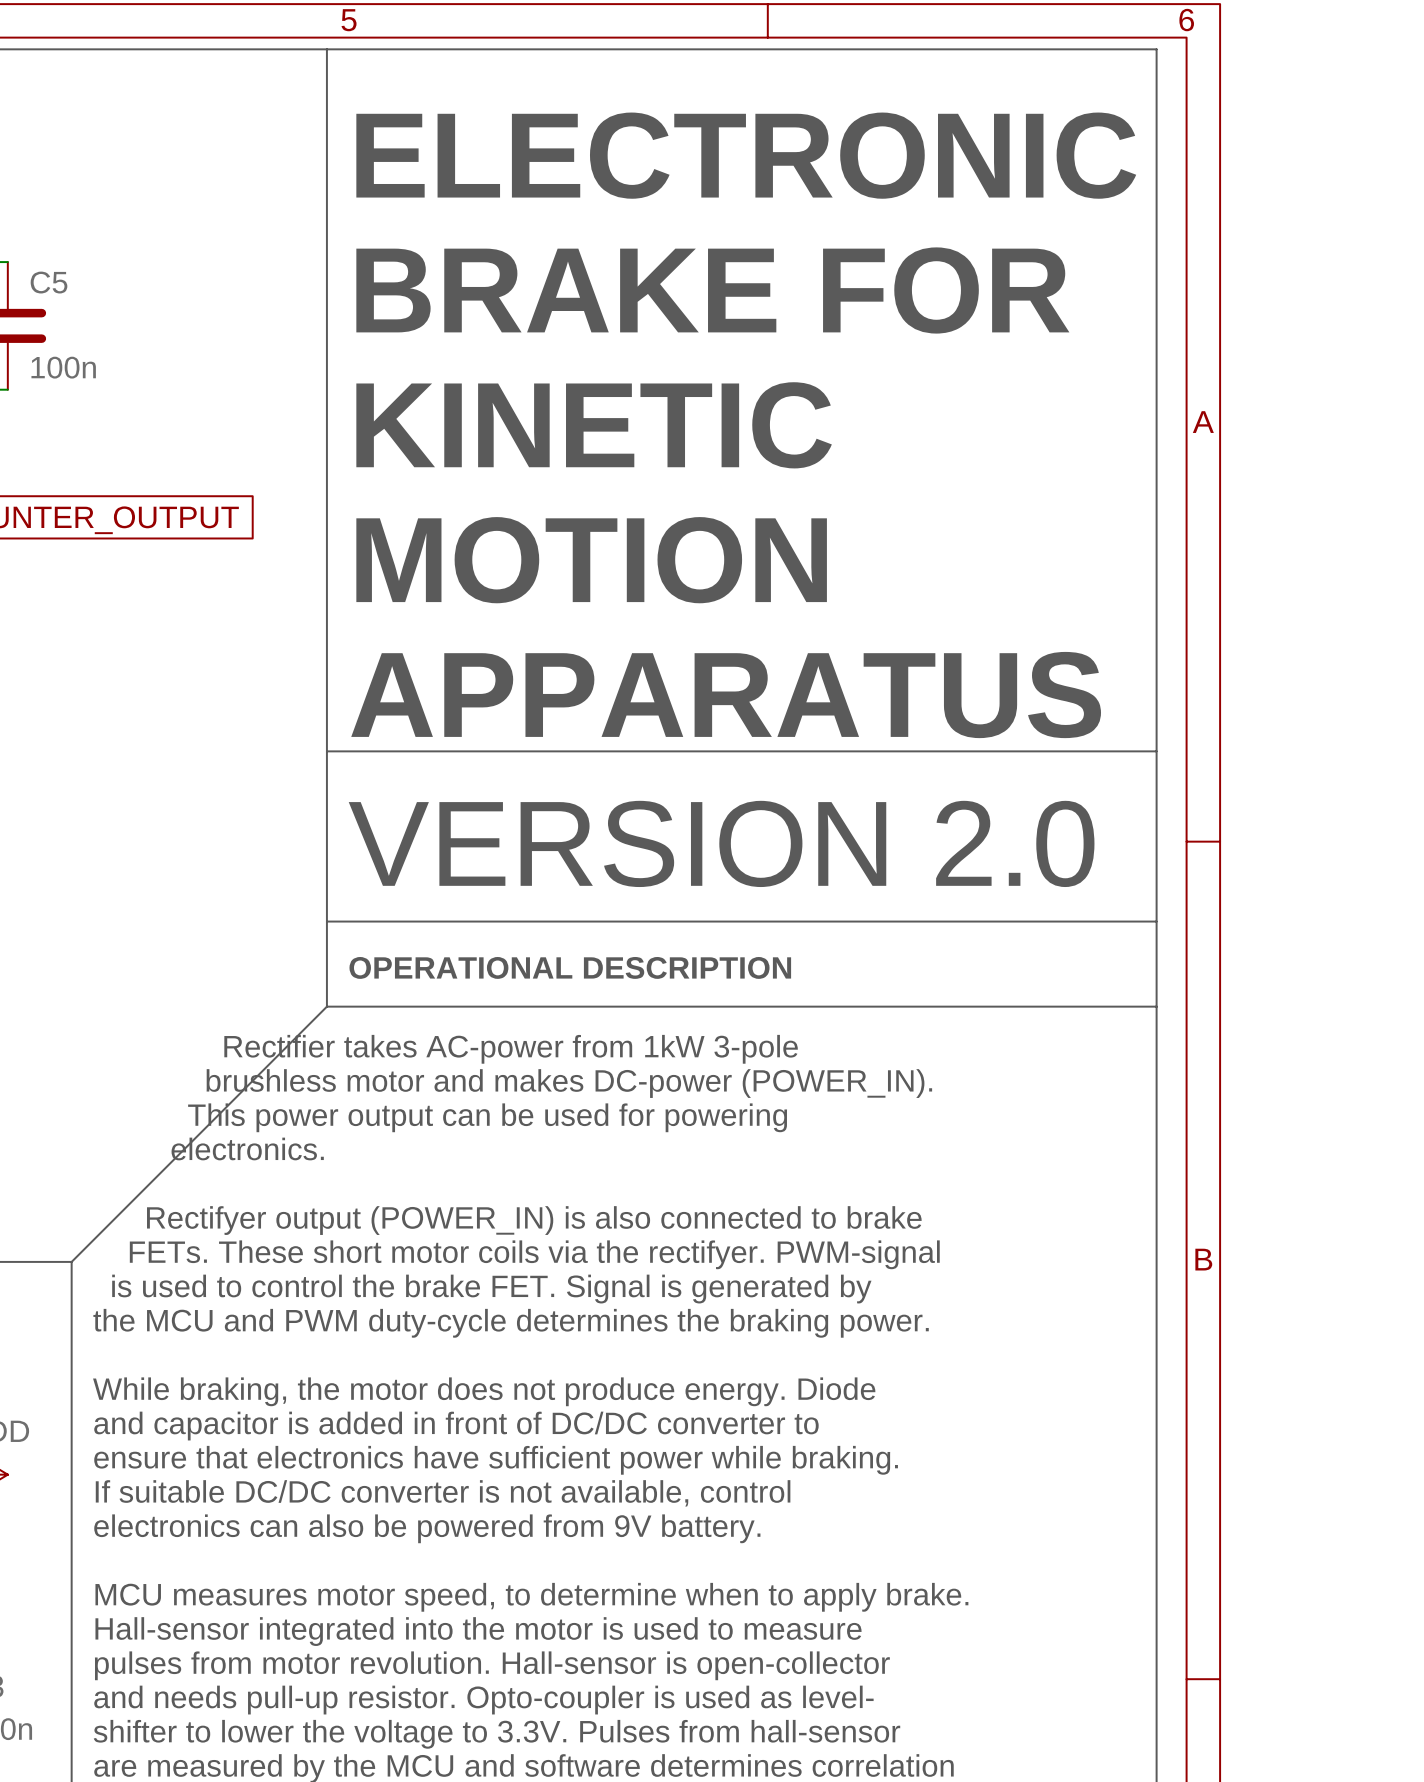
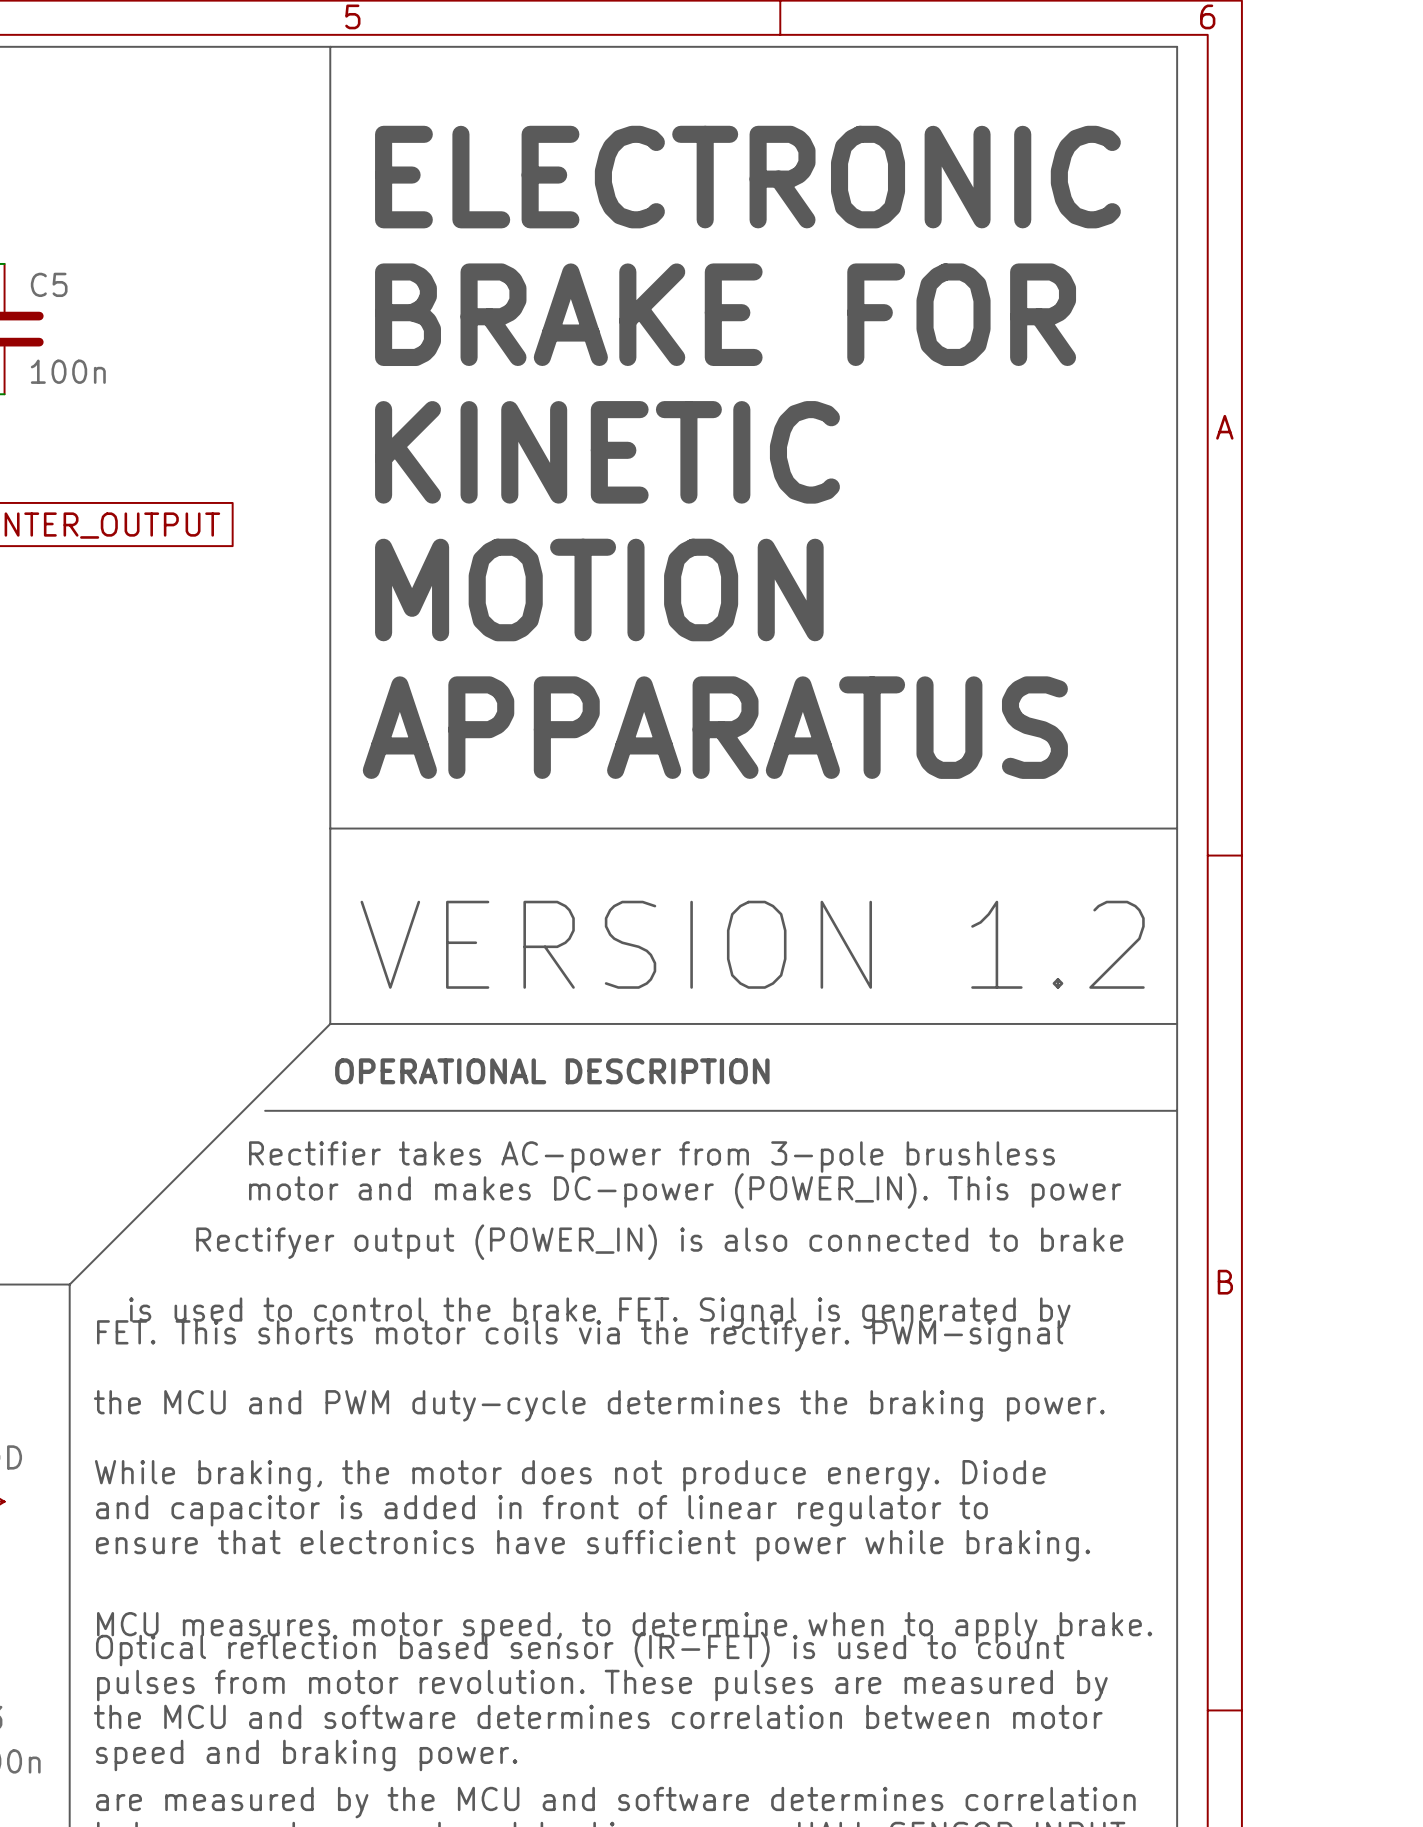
text position: ELECTRONIC (746, 155) -> ELECTRONIC (747, 177)
text position: BRAKE FOR (712, 290) -> BRAKE FOR (725, 314)
text position: KINETIC (594, 425) -> KINETIC (607, 452)
text position: MOTION (591, 560) -> MOTION (599, 589)
text position: APPARATUS (726, 695) -> APPARATUS (715, 727)
line: (326, 751) (1156, 751) -> (330, 828) (1177, 828)
text: VERSION 2.0 (721, 843) -> none
line: (326, 921) (1156, 921) -> none
text: OPERATIONAL DESCRIPTION (570, 967) -> VERSION 1.2 (752, 944)
text: Rectifier takes AC-power from 1kW 3-pole (511, 1049) -> none
text: none -> OPERATIONAL DESCRIPTION (552, 1071)
text: brushless motor and makes DC-power (POWER_IN). (569, 1083) -> none
line: none -> (265, 1110) (1177, 1110)
text: This power output can be used for powering (487, 1117) -> none
text: none -> Rectifier takes AC-power from 3-pole brushless (652, 1157)
text: electronics. (247, 1148) -> none
text: none -> motor and makes DC-power (POWER_IN). This power (685, 1190)
text: FETs. These short motor coils via the rectifyer. PWM-signal (534, 1254) -> none
text: none -> FET. This shorts motor coils via the rectifyer. PWM-signal (580, 1335)
text position: the MCU and PWM duty-cycle determines the braking power. (511, 1323) -> the MCU and PWM duty-cycle determines the braking power. (599, 1405)
text position: While braking, the motor does not produce energy. Diode (484, 1391) -> While braking, the motor does not produce energy. Diode (570, 1475)
text: and capacitor is added in front of DC/DC converter to (456, 1426) -> none
text position: ensure that electronics have sufficient power while braking. (496, 1460) -> ensure that electronics have sufficient power while braking. (593, 1545)
text: If suitable DC/DC converter is not available, control (443, 1493) -> and capacitor is added in front of linear regulator to (541, 1510)
text: electronics can also be powered from 9V battery. (427, 1528) -> none
text: none -> Optical reflection based sensor (IR-FET) is used to count (580, 1649)
text: Hall-sensor integrated into the motor is used to measure (478, 1631) -> none
text: pulses from motor revolution. Hall-sensor is open-collector (492, 1665) -> pulses from motor revolution. These pulses are measured by (602, 1685)
text: none -> the MCU and software determines correlation between motor (598, 1716)
text: and needs pull-up resistor. Opto-coupler is used as level- (483, 1700) -> none
text: none -> speed and braking power. (306, 1755)
text: shifter to lower the voltage to 3.3V. Pulses from hall-sensor (497, 1734) -> none

